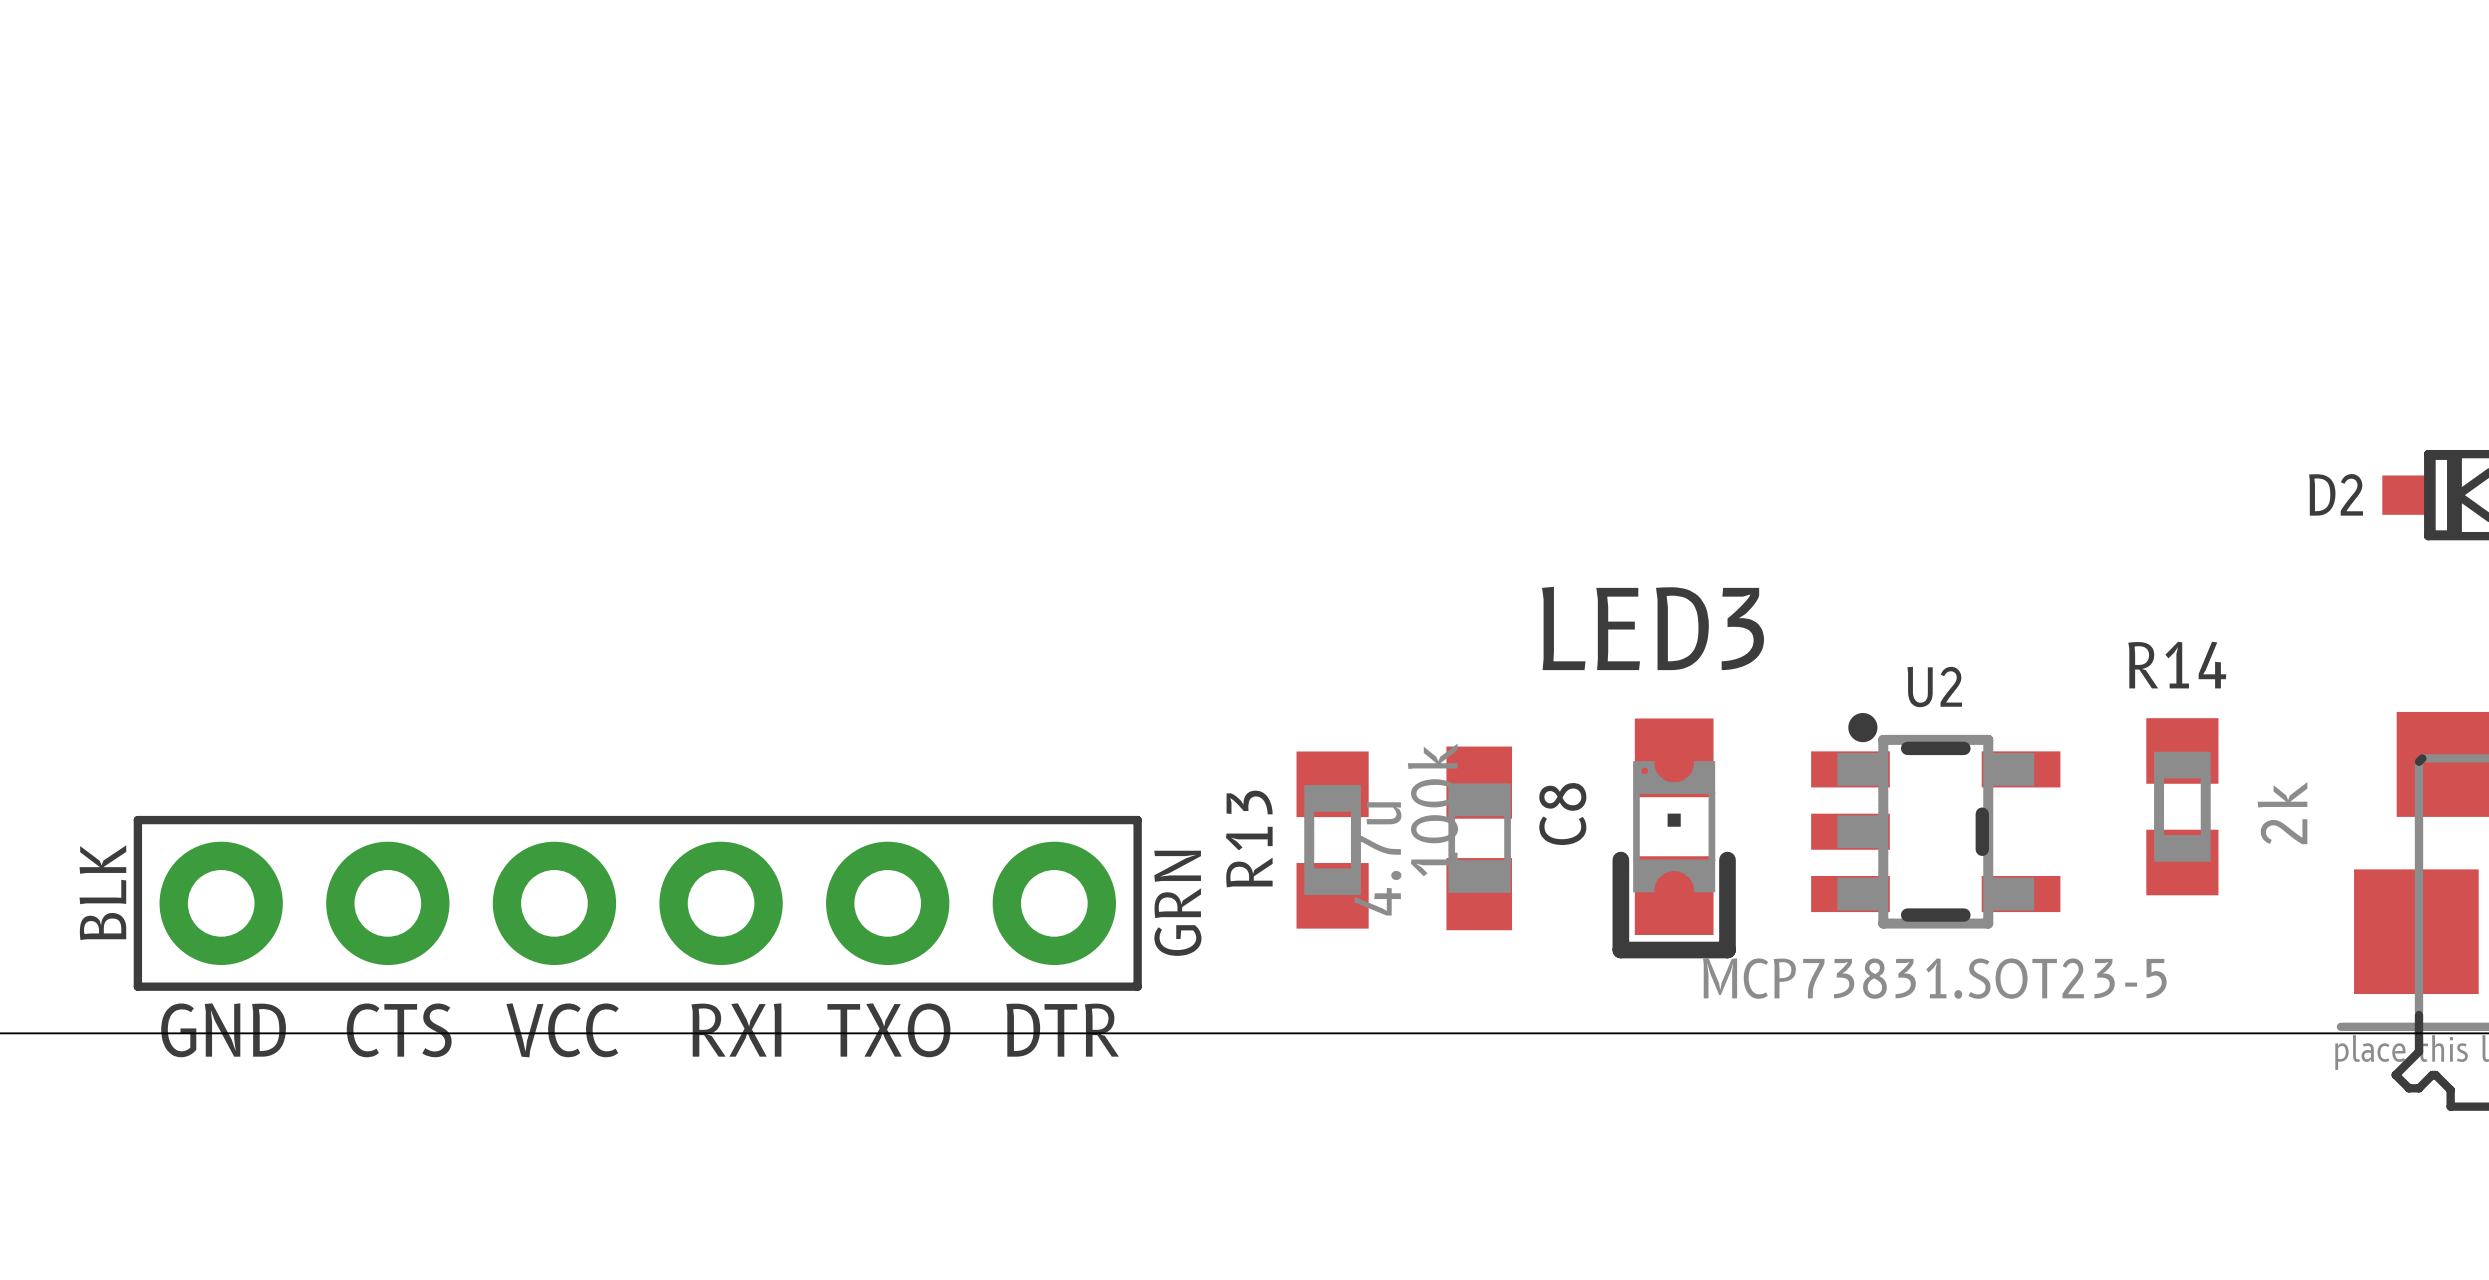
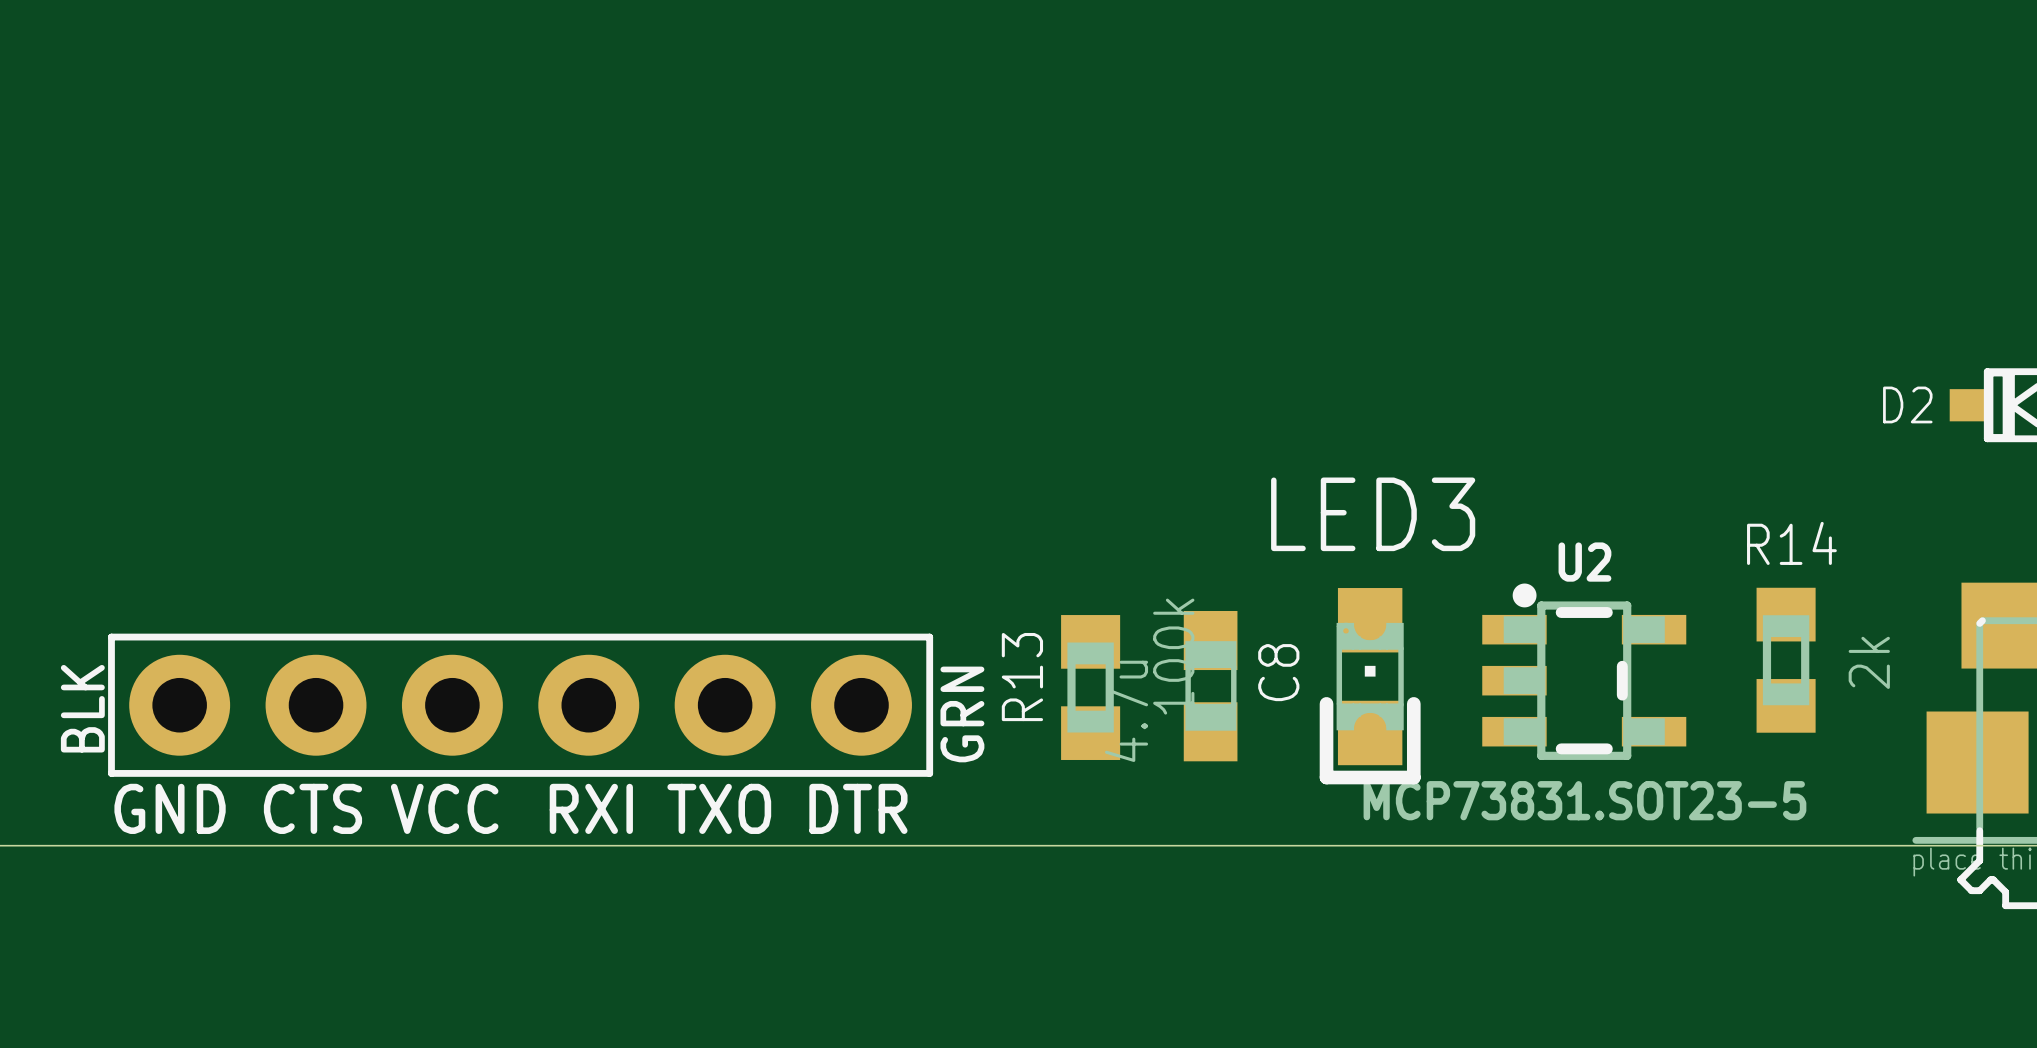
part position: (637, 903) -> (520, 705)

